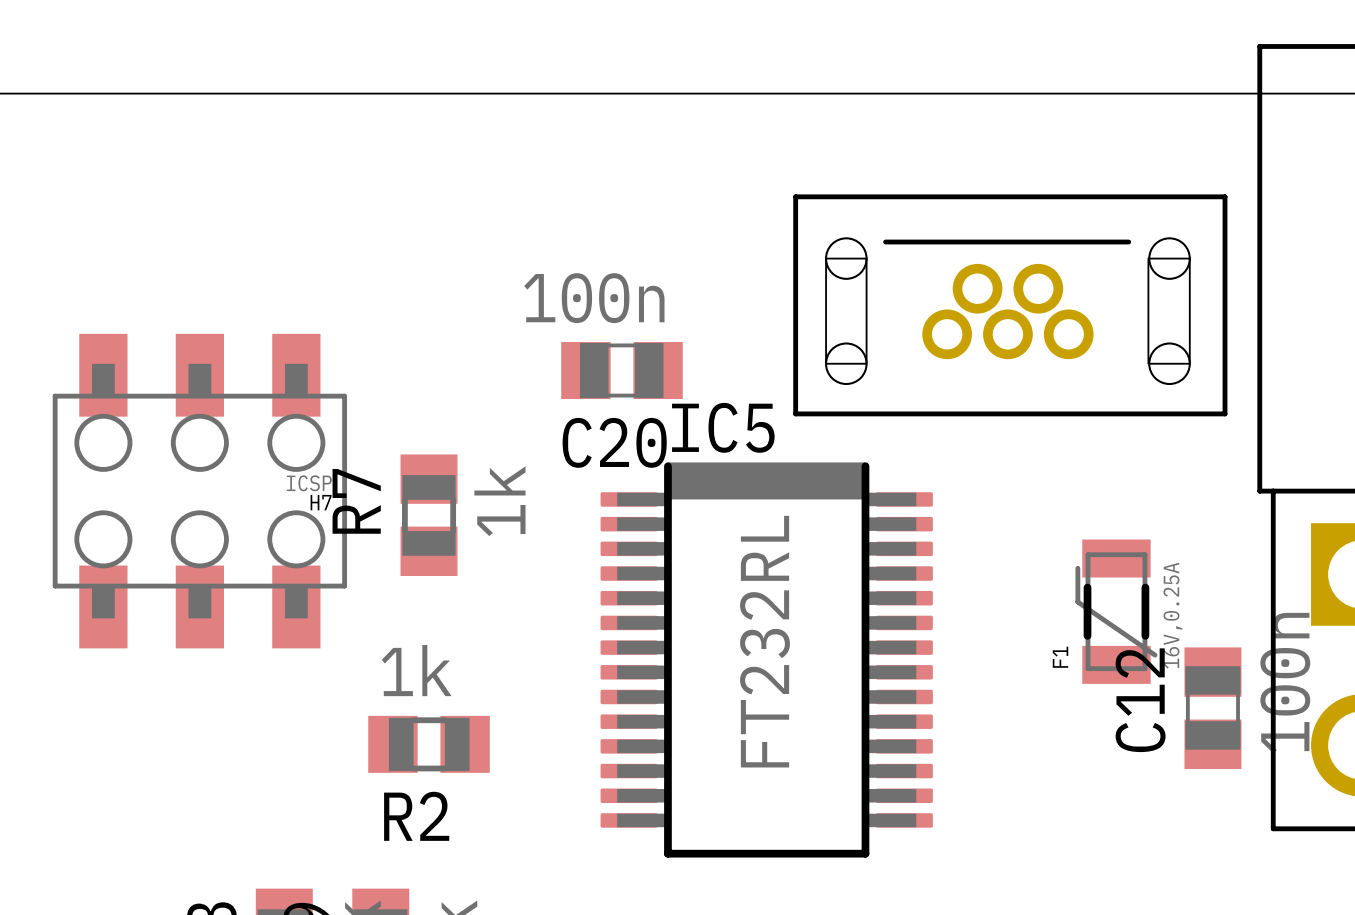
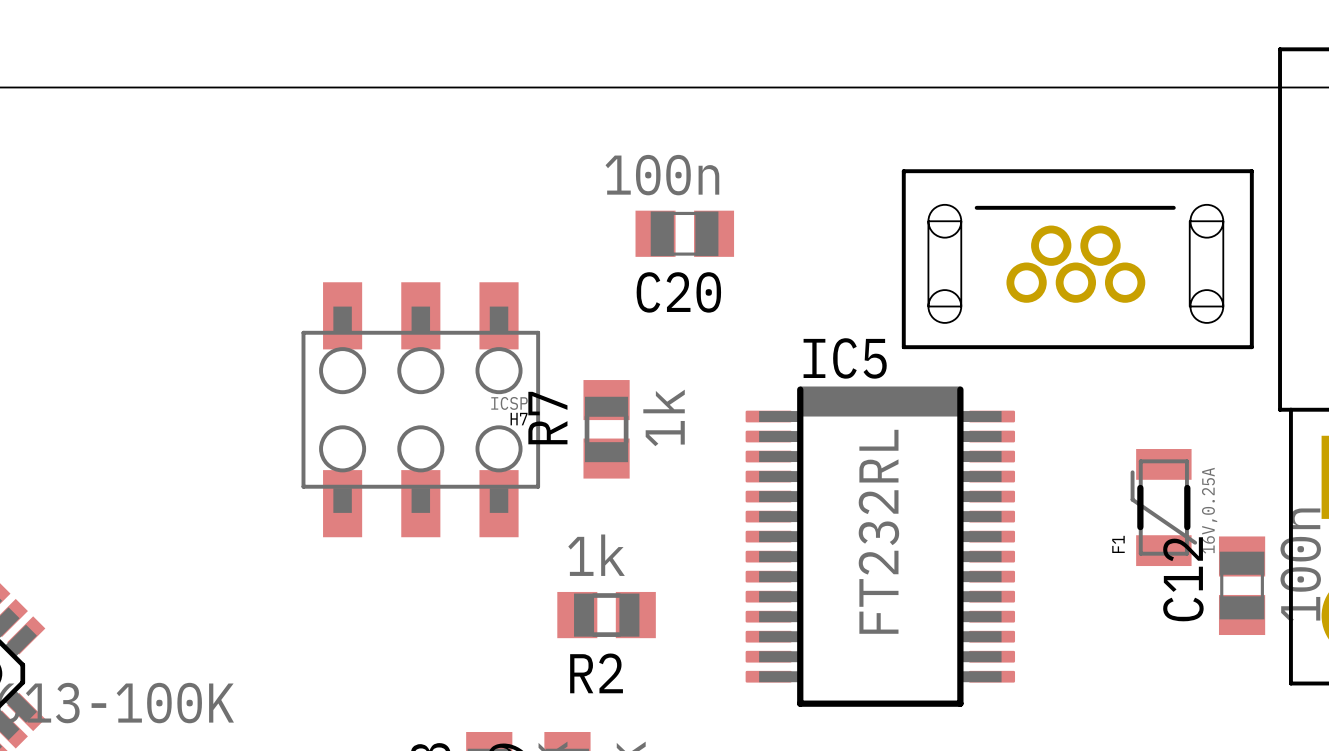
C20 position: (621, 370) -> (684, 233)

